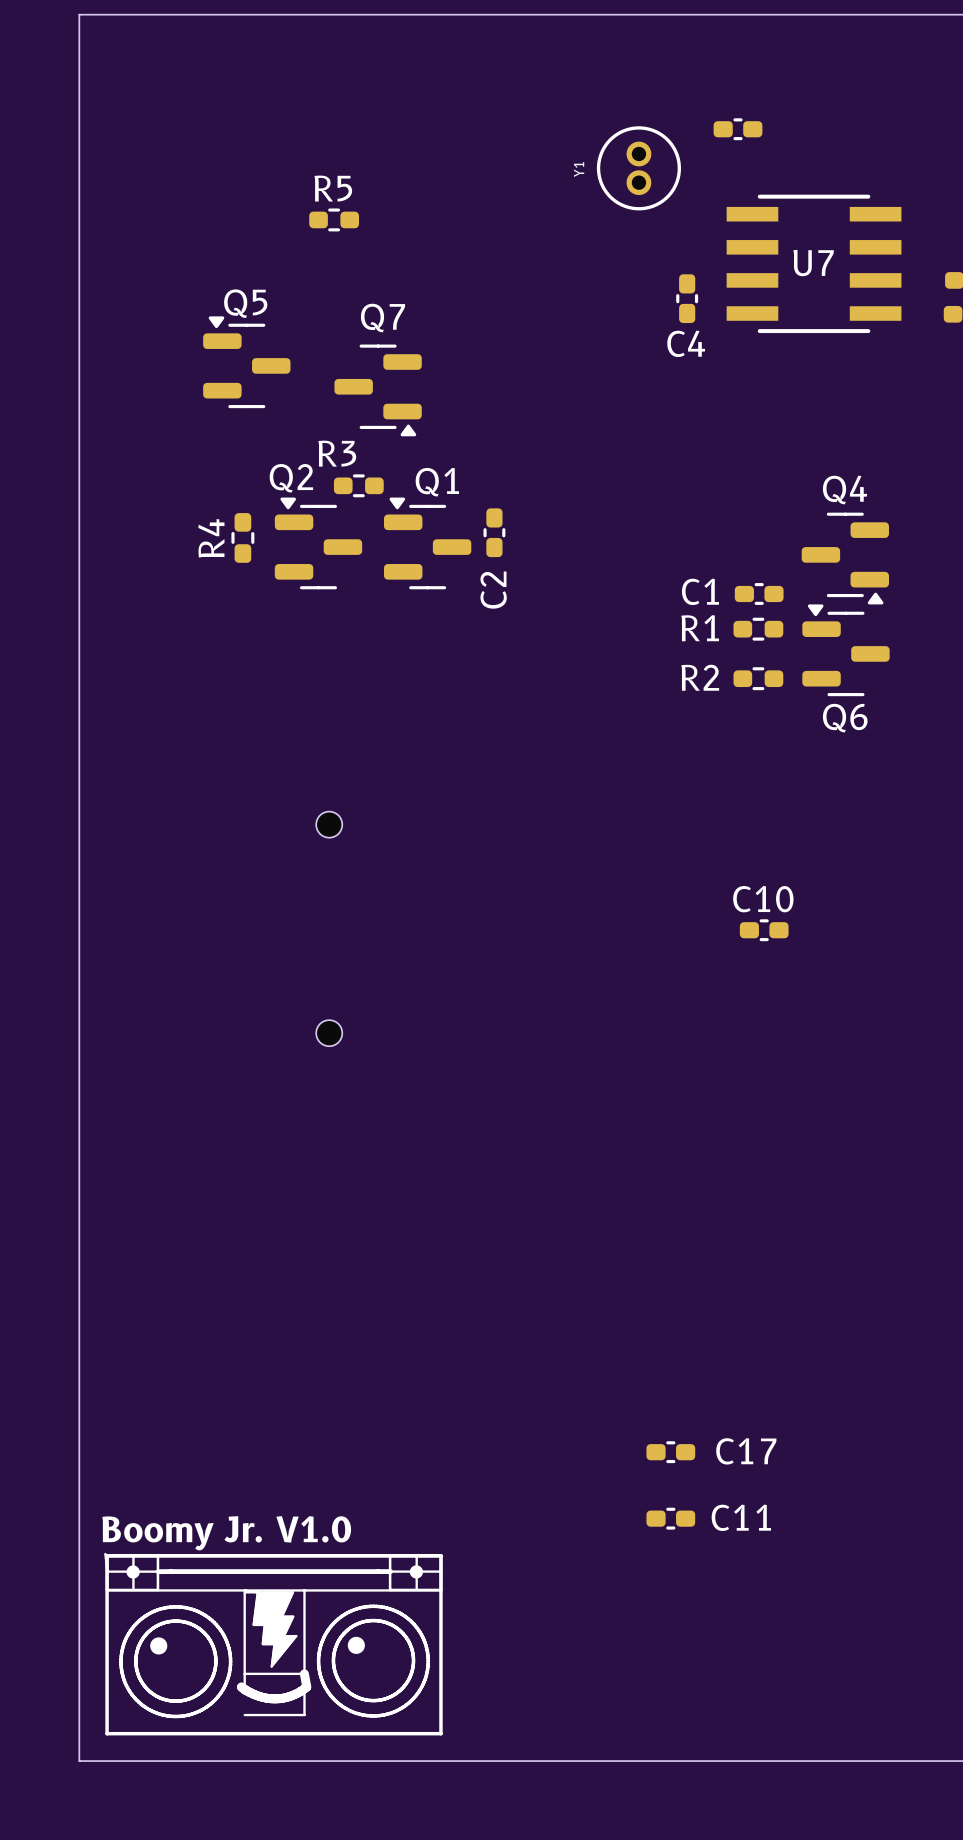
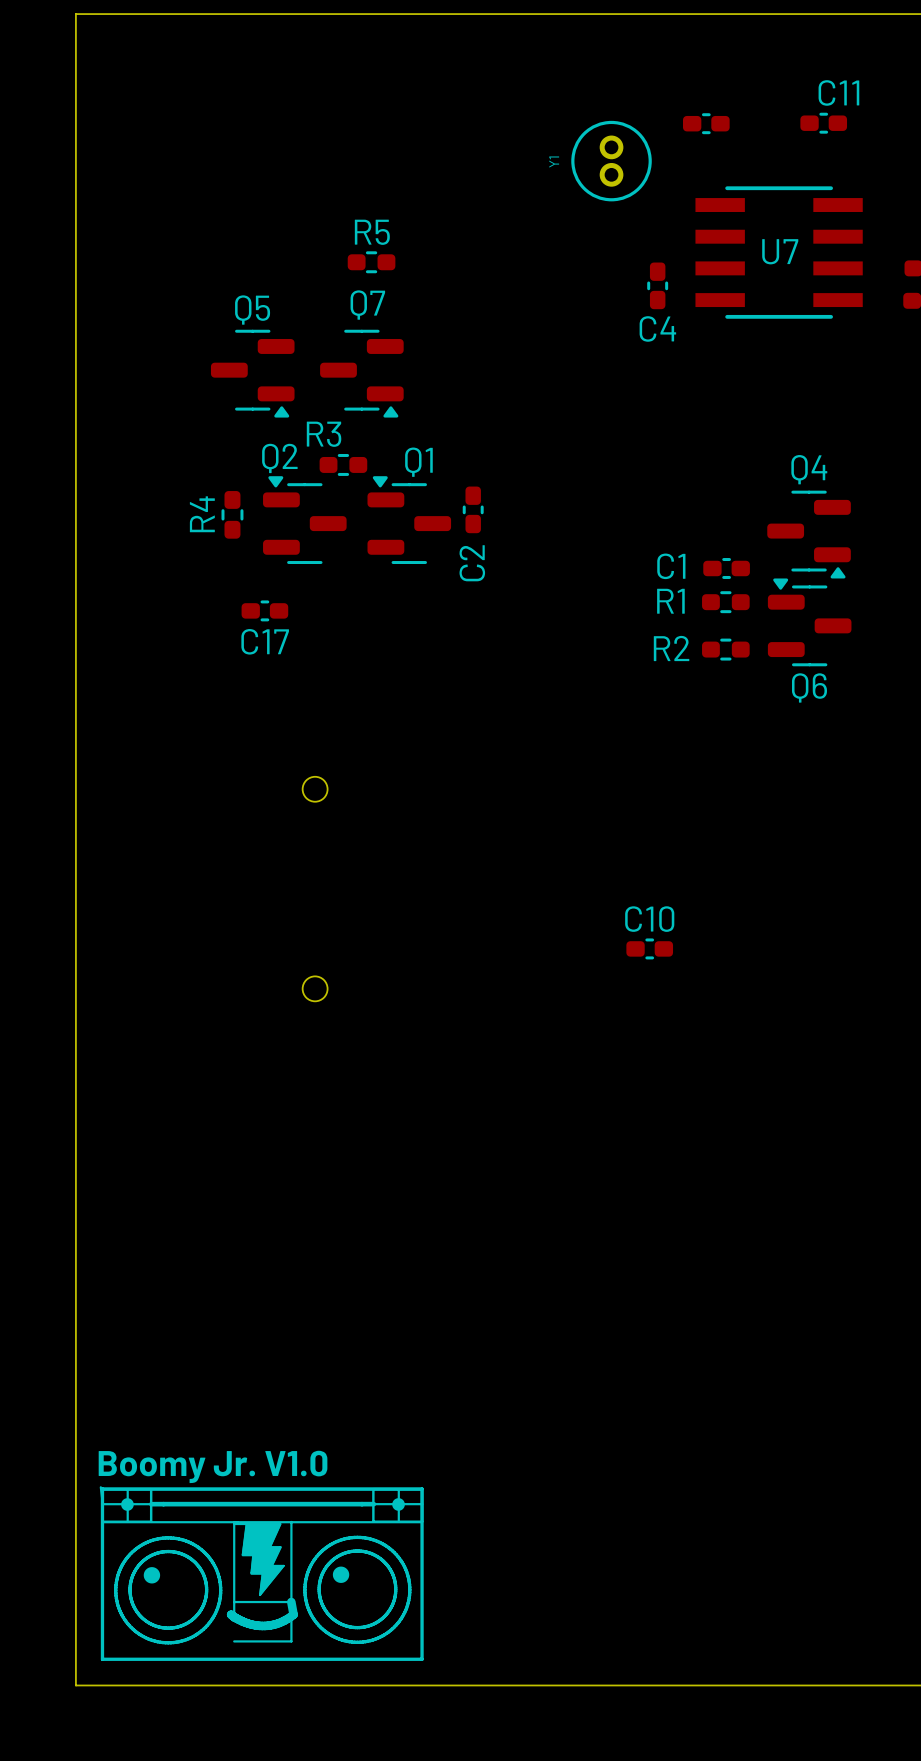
R5 position: (334, 219) -> (371, 262)
Q5 rotation: 0° (246, 362) -> 180° (252, 373)
C10 position: (764, 930) -> (649, 948)
C17 name position: C17 (746, 1451) -> C17 (265, 641)
C17 position: (670, 1452) -> (264, 610)
C11 name position: C11 (741, 1517) -> C11 (838, 92)
C11 position: (670, 1518) -> (823, 123)

